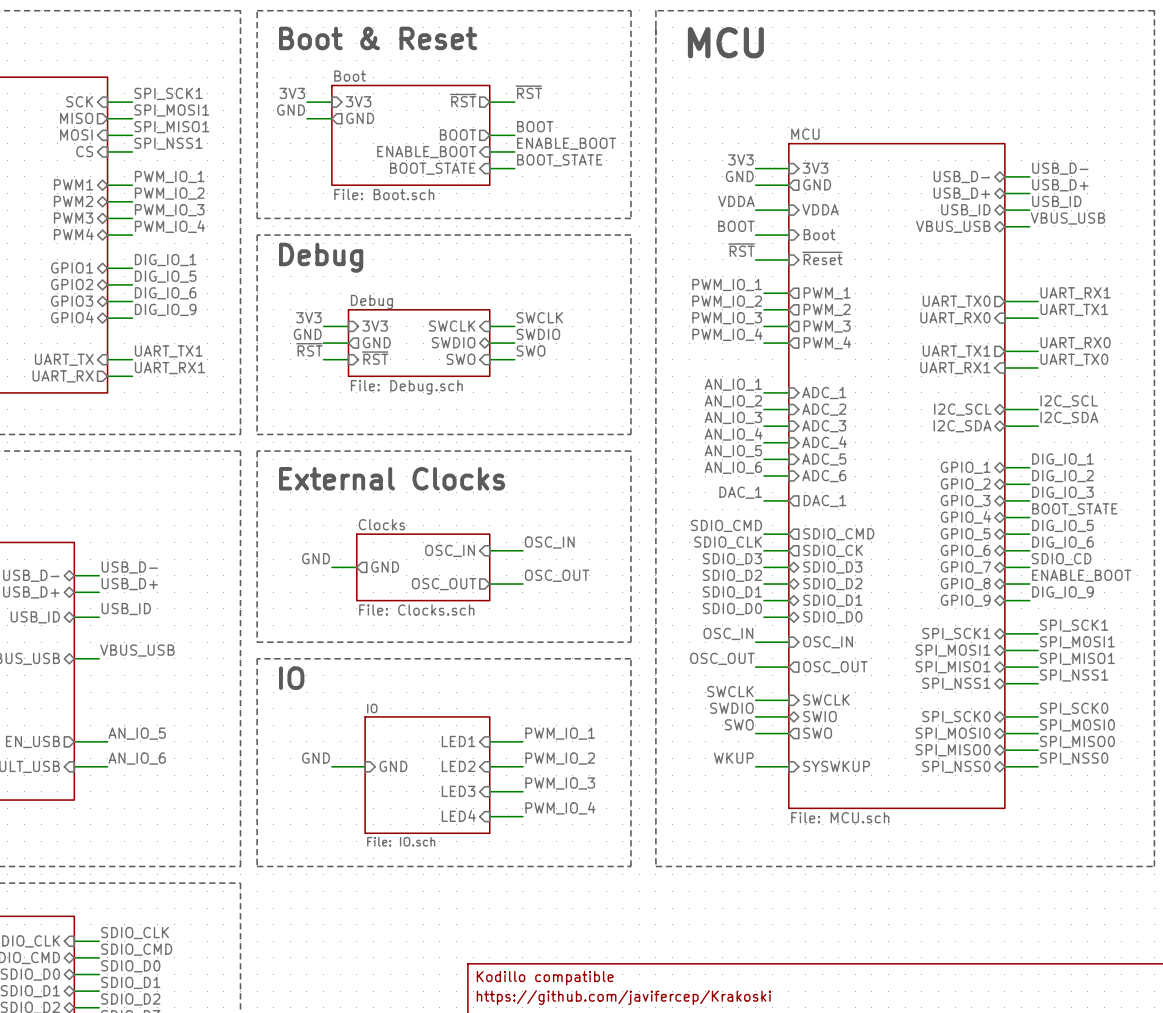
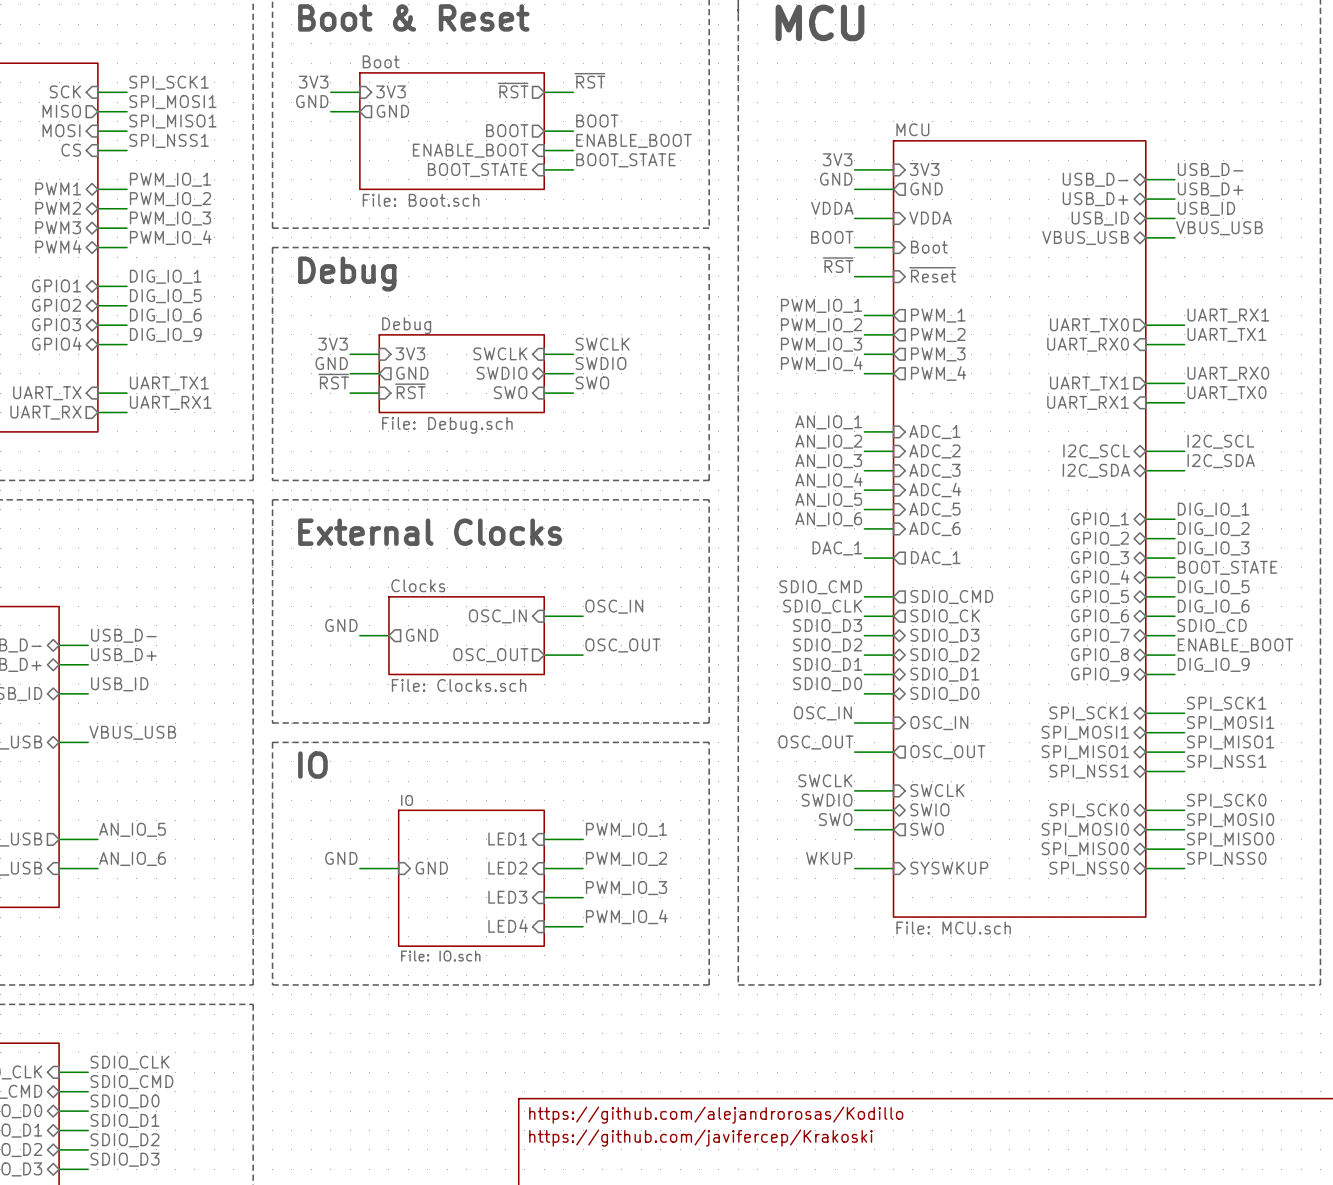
title block: Kodillo compatible (545, 978) -> https://github.com/alejandrorosas/Kodillo (716, 1115)

